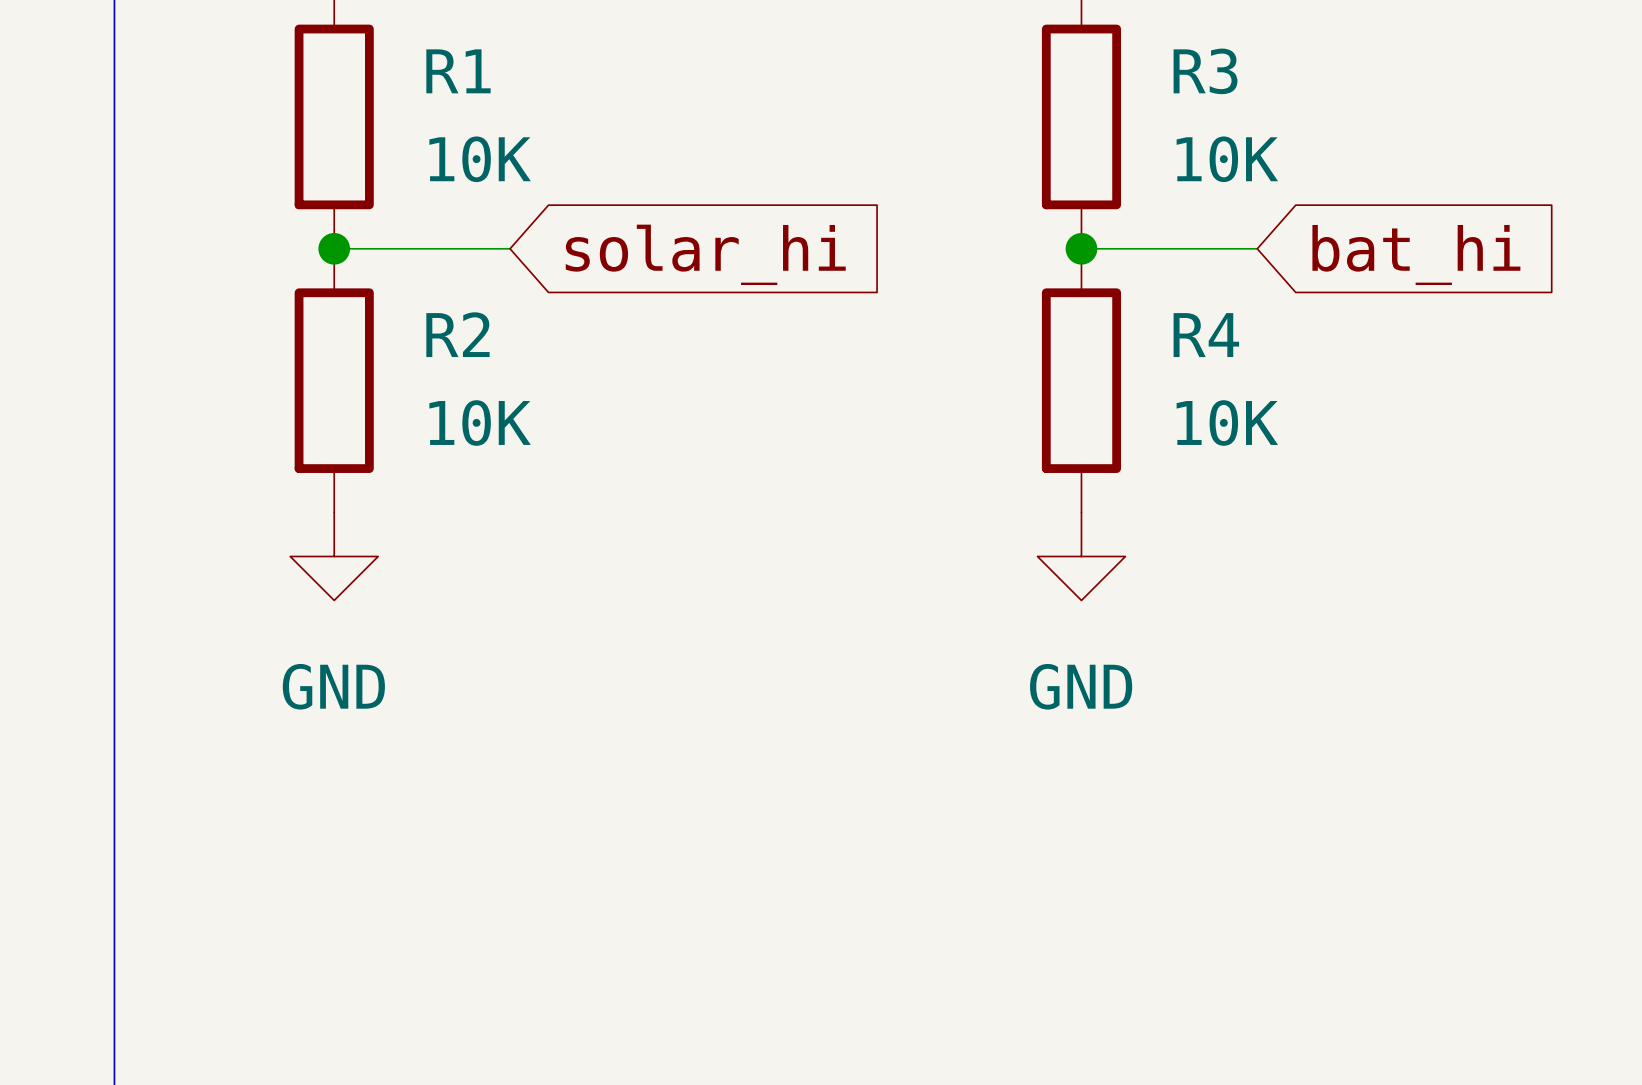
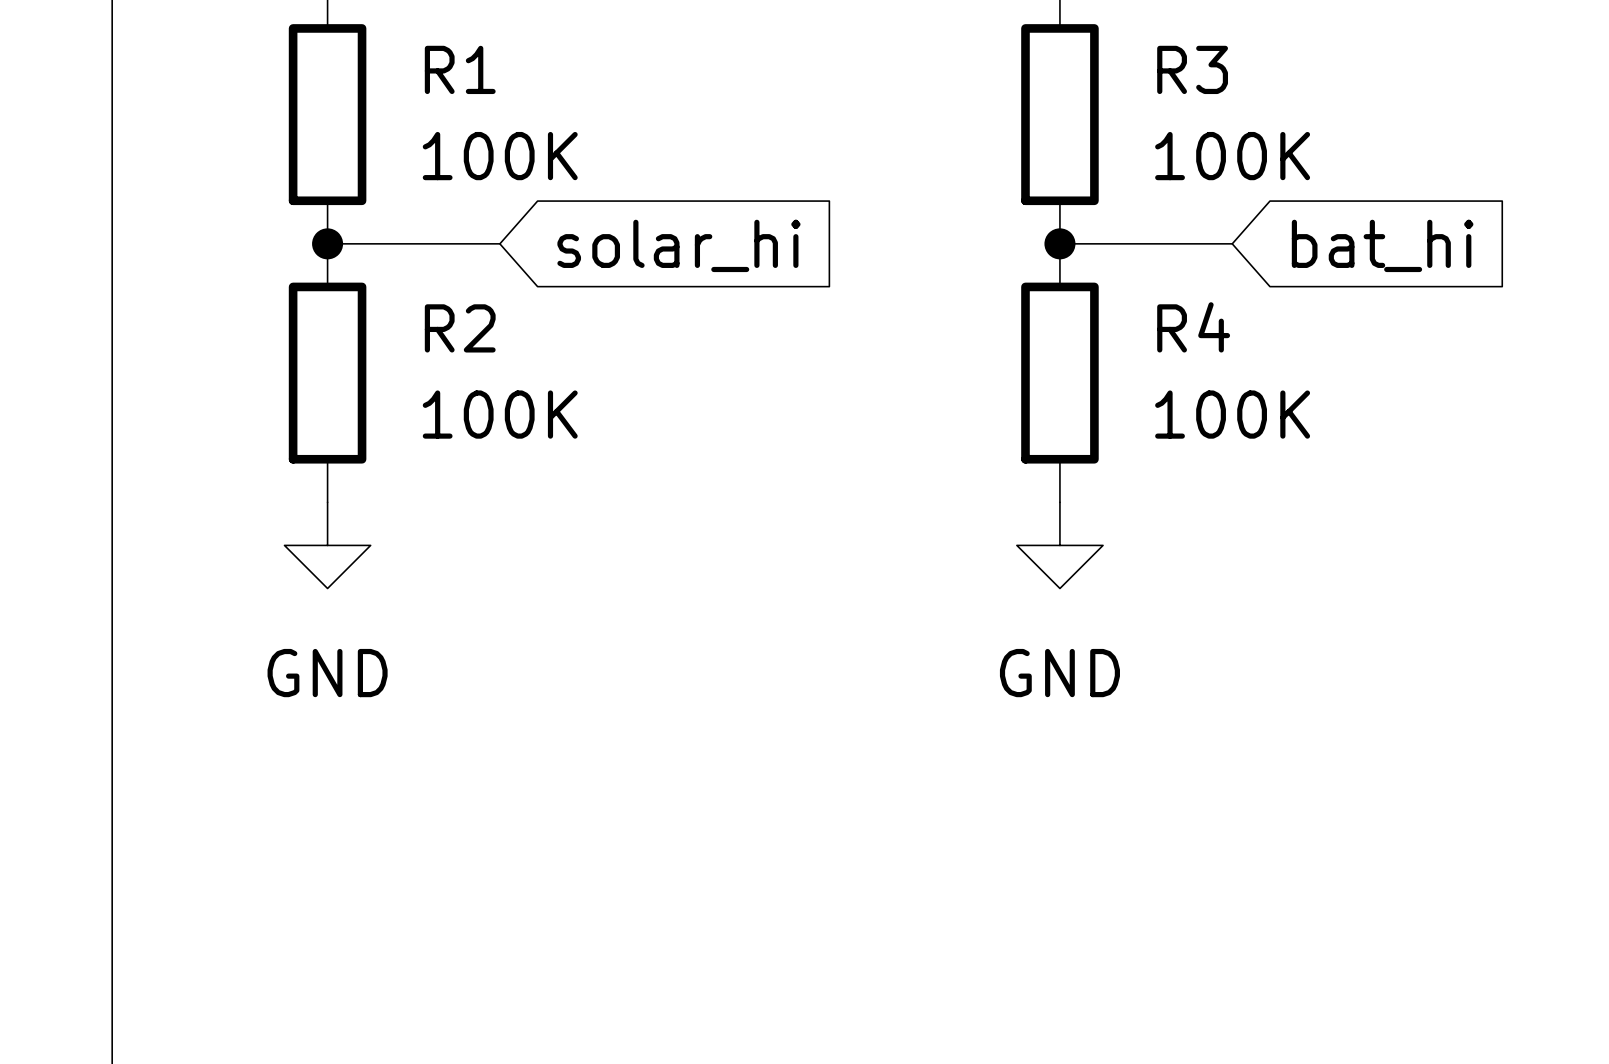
R1 value: 10K (480, 159) -> 100K (500, 156)
R3 value: 10K (1227, 159) -> 100K (1232, 156)
R2 value: 10K (480, 423) -> 100K (500, 414)
R4 value: 10K (1227, 423) -> 100K (1232, 414)

